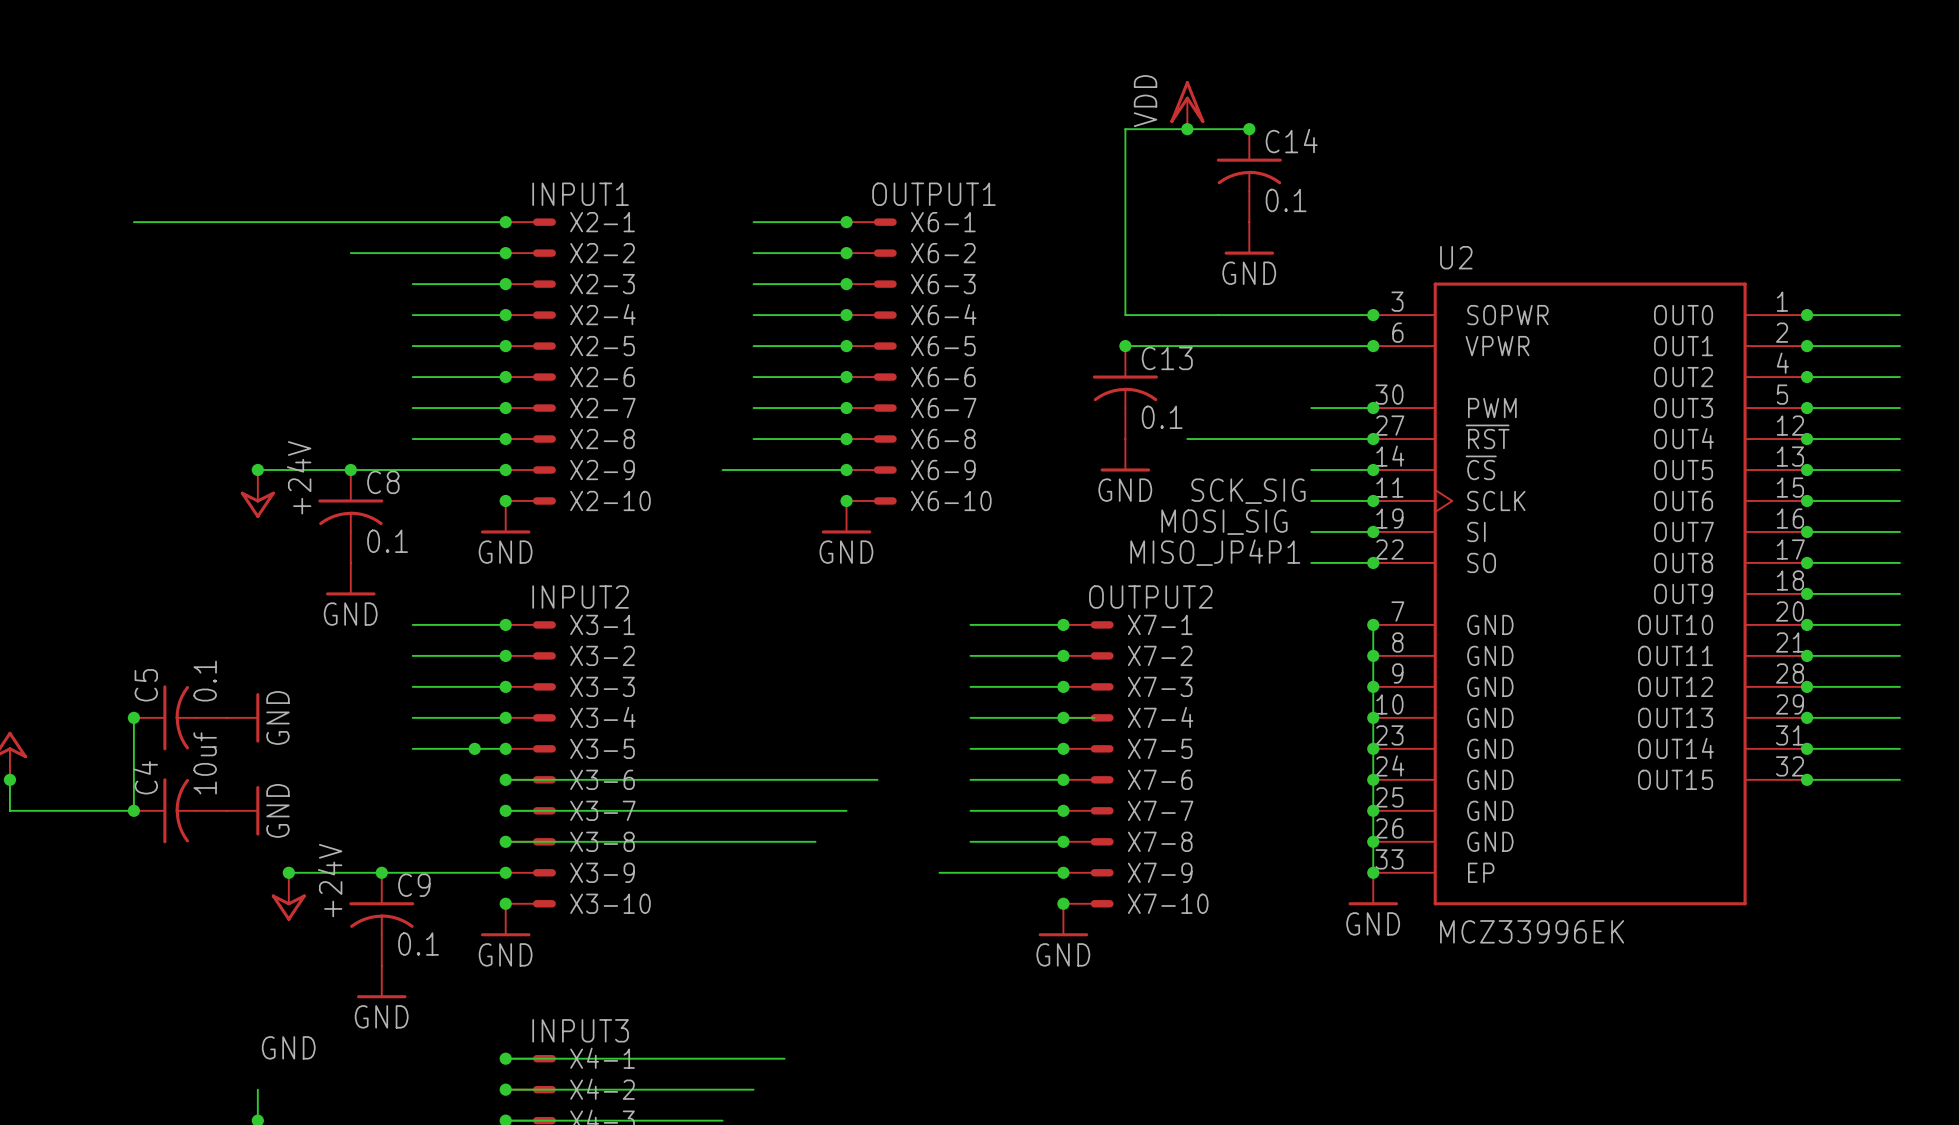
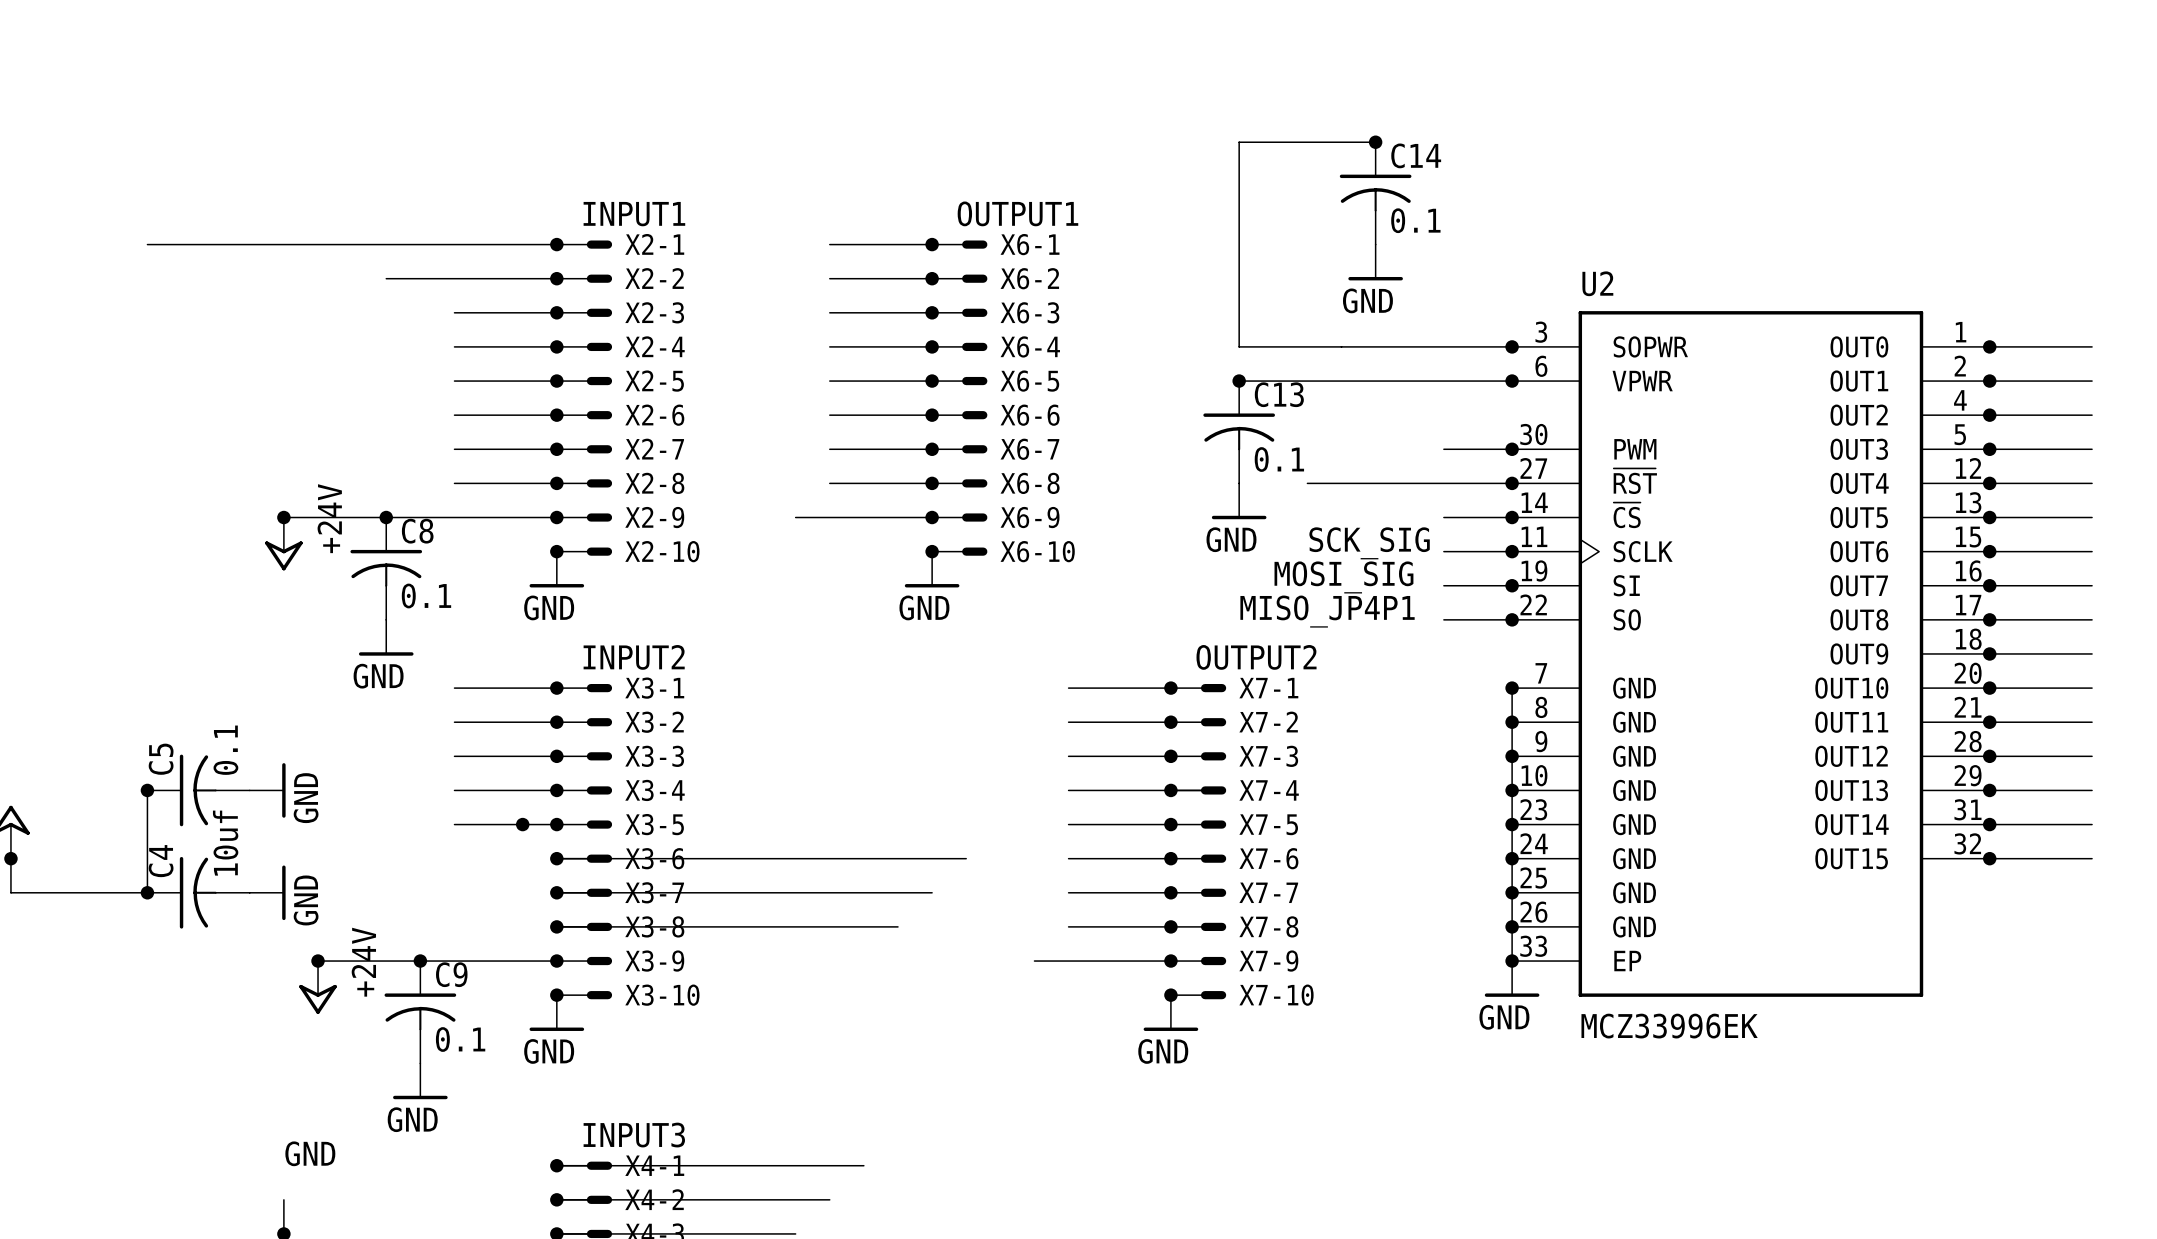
power symbol: VDD (1187, 105) -> none
junction: (1187, 129) -> none

